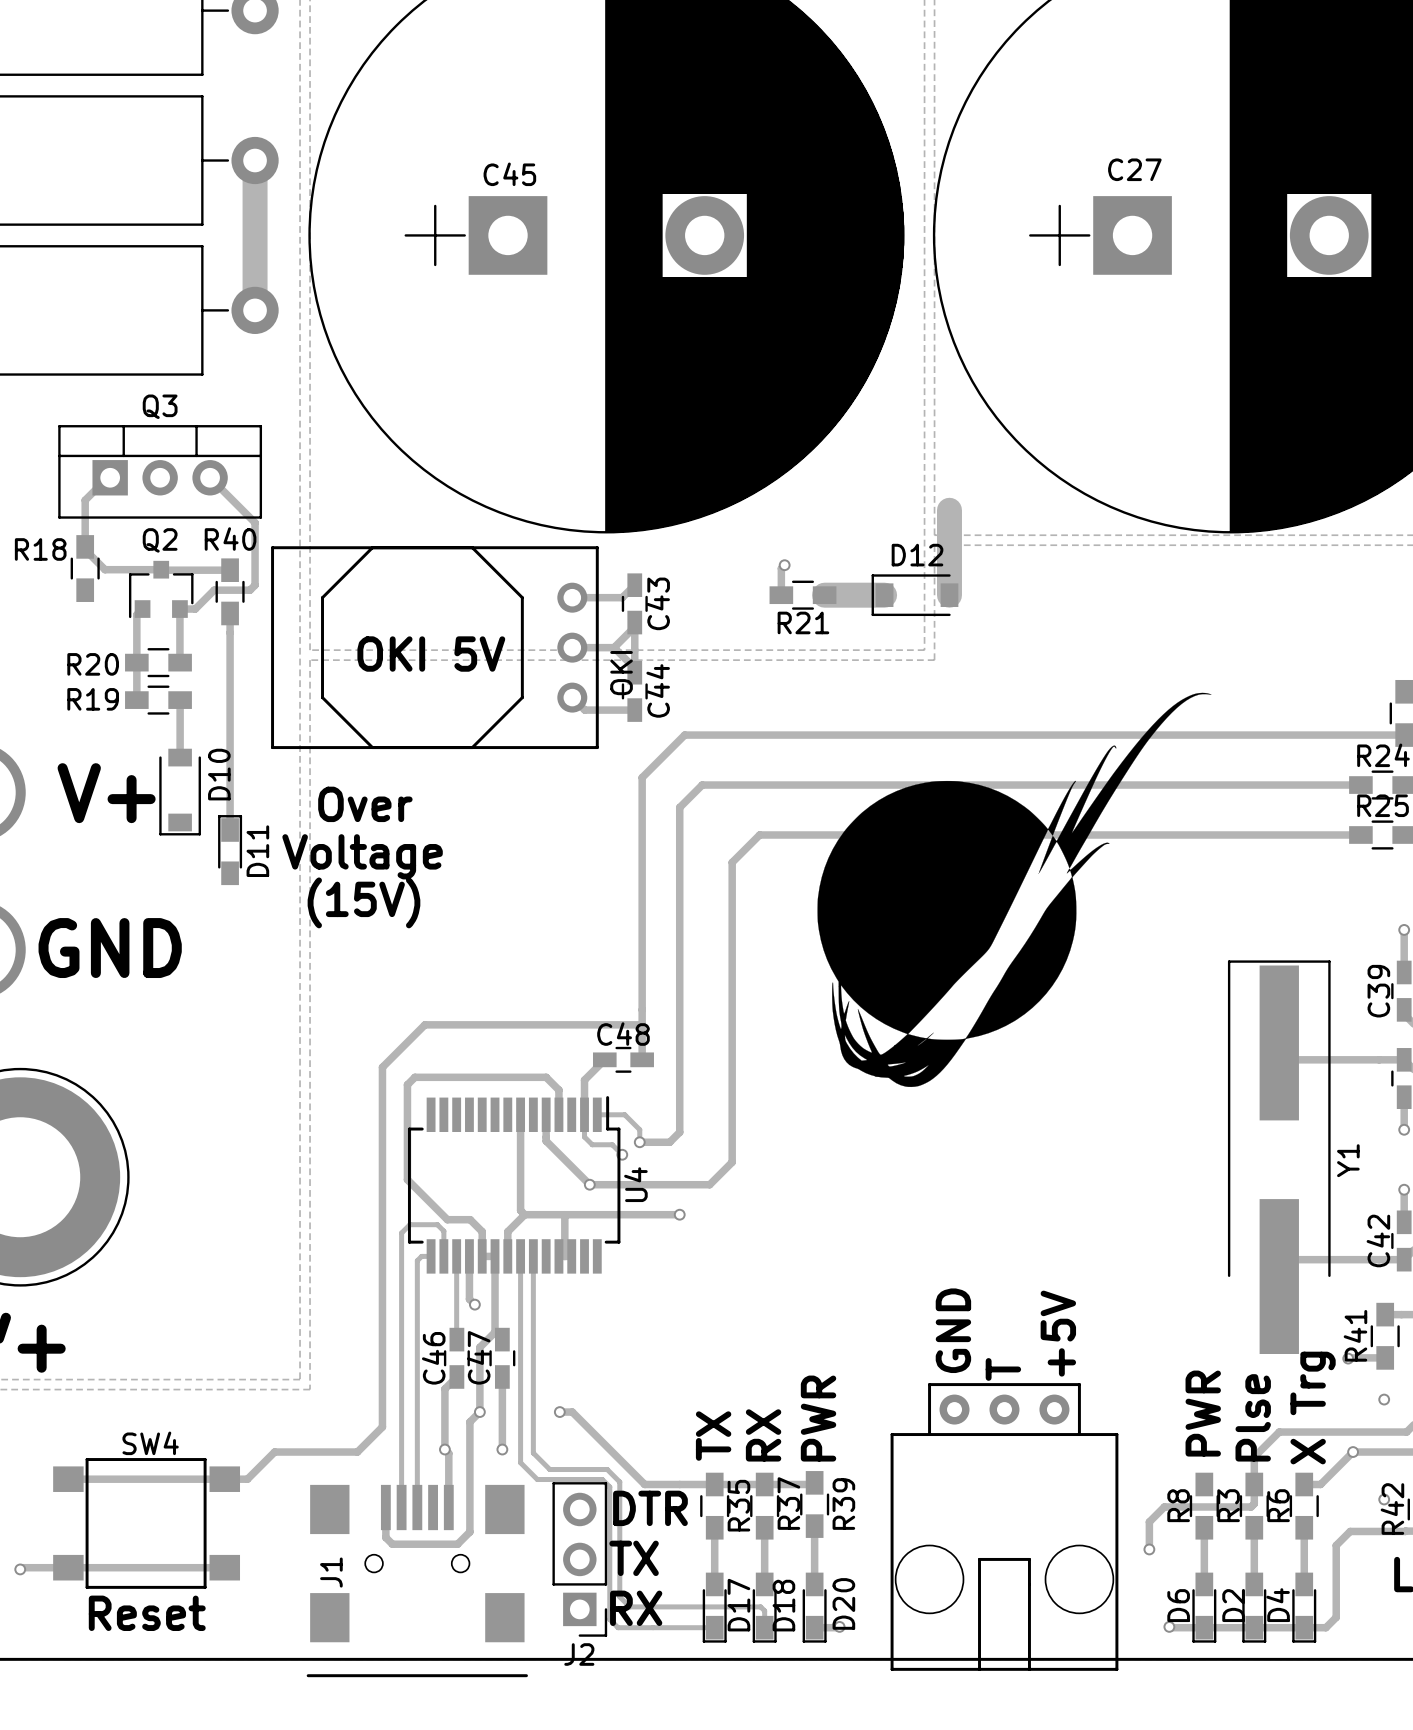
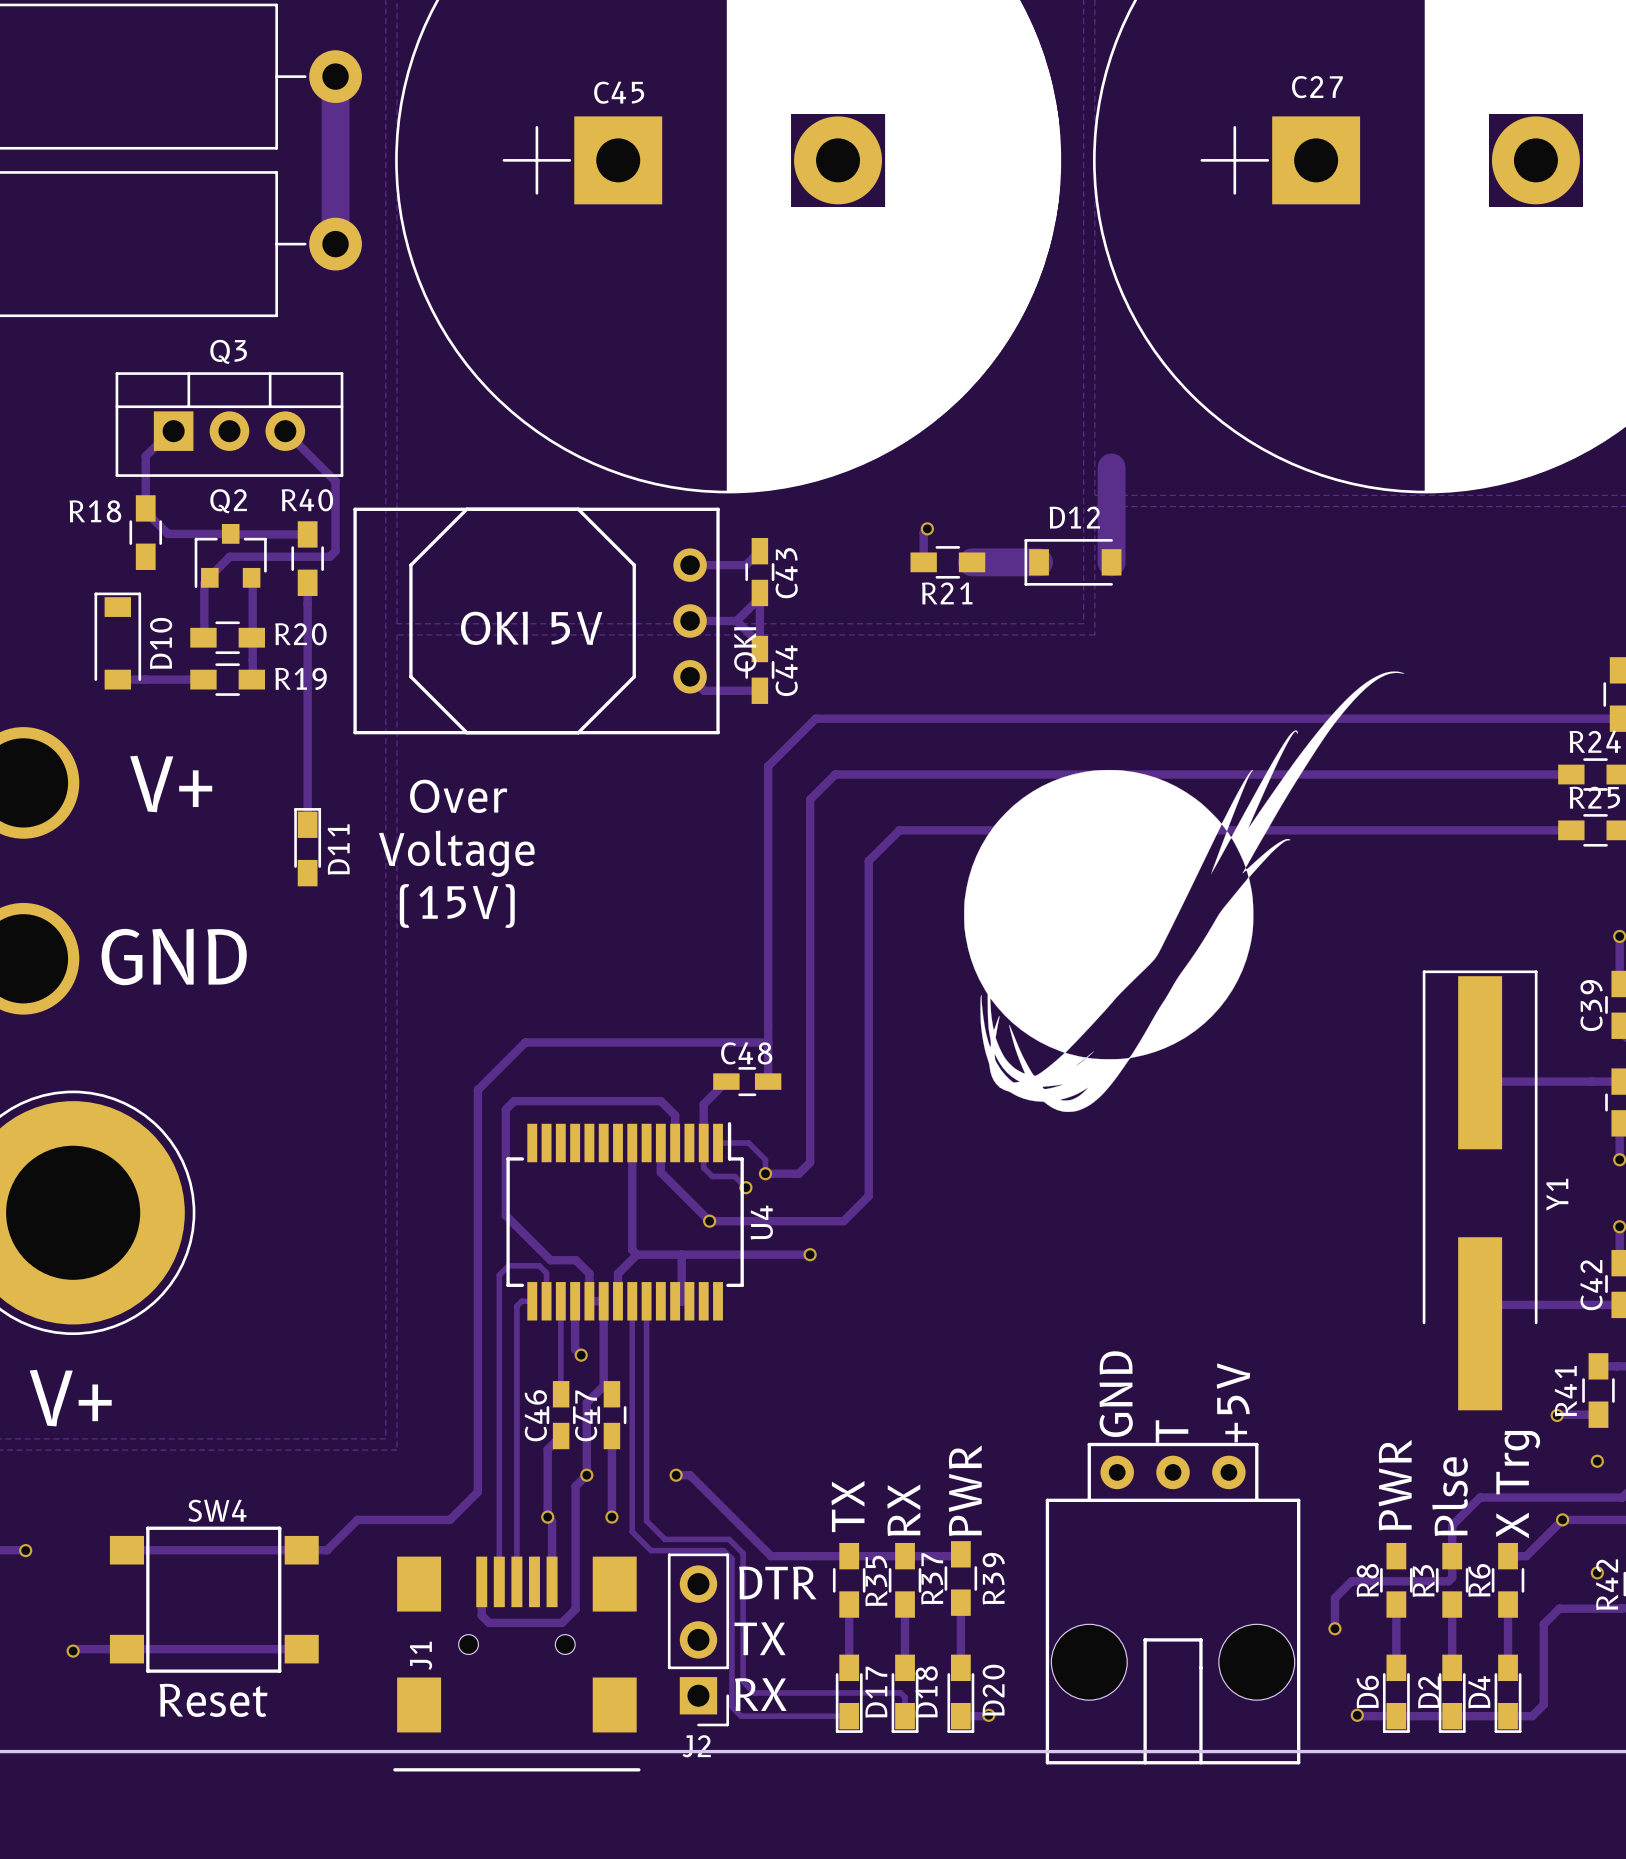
track: (214, 590) (195, 609) (179, 609) (179, 662) -> (289, 556) (229, 556) (209, 577)
track: none -> (251, 577) (252, 679)
track: (137, 613) (136, 700) -> (204, 583) (204, 637) (207, 637)
R20 name position: R20 (93, 664) -> R20 (300, 634)
R19 name position: R19 (93, 699) -> R19 (300, 678)
track: none -> (117, 679) (204, 679) (201, 682)
track: (180, 700) (180, 757) -> none
D10 rotation: 0° (180, 792) -> 180° (117, 641)
D10 position: (180, 792) -> (117, 641)

